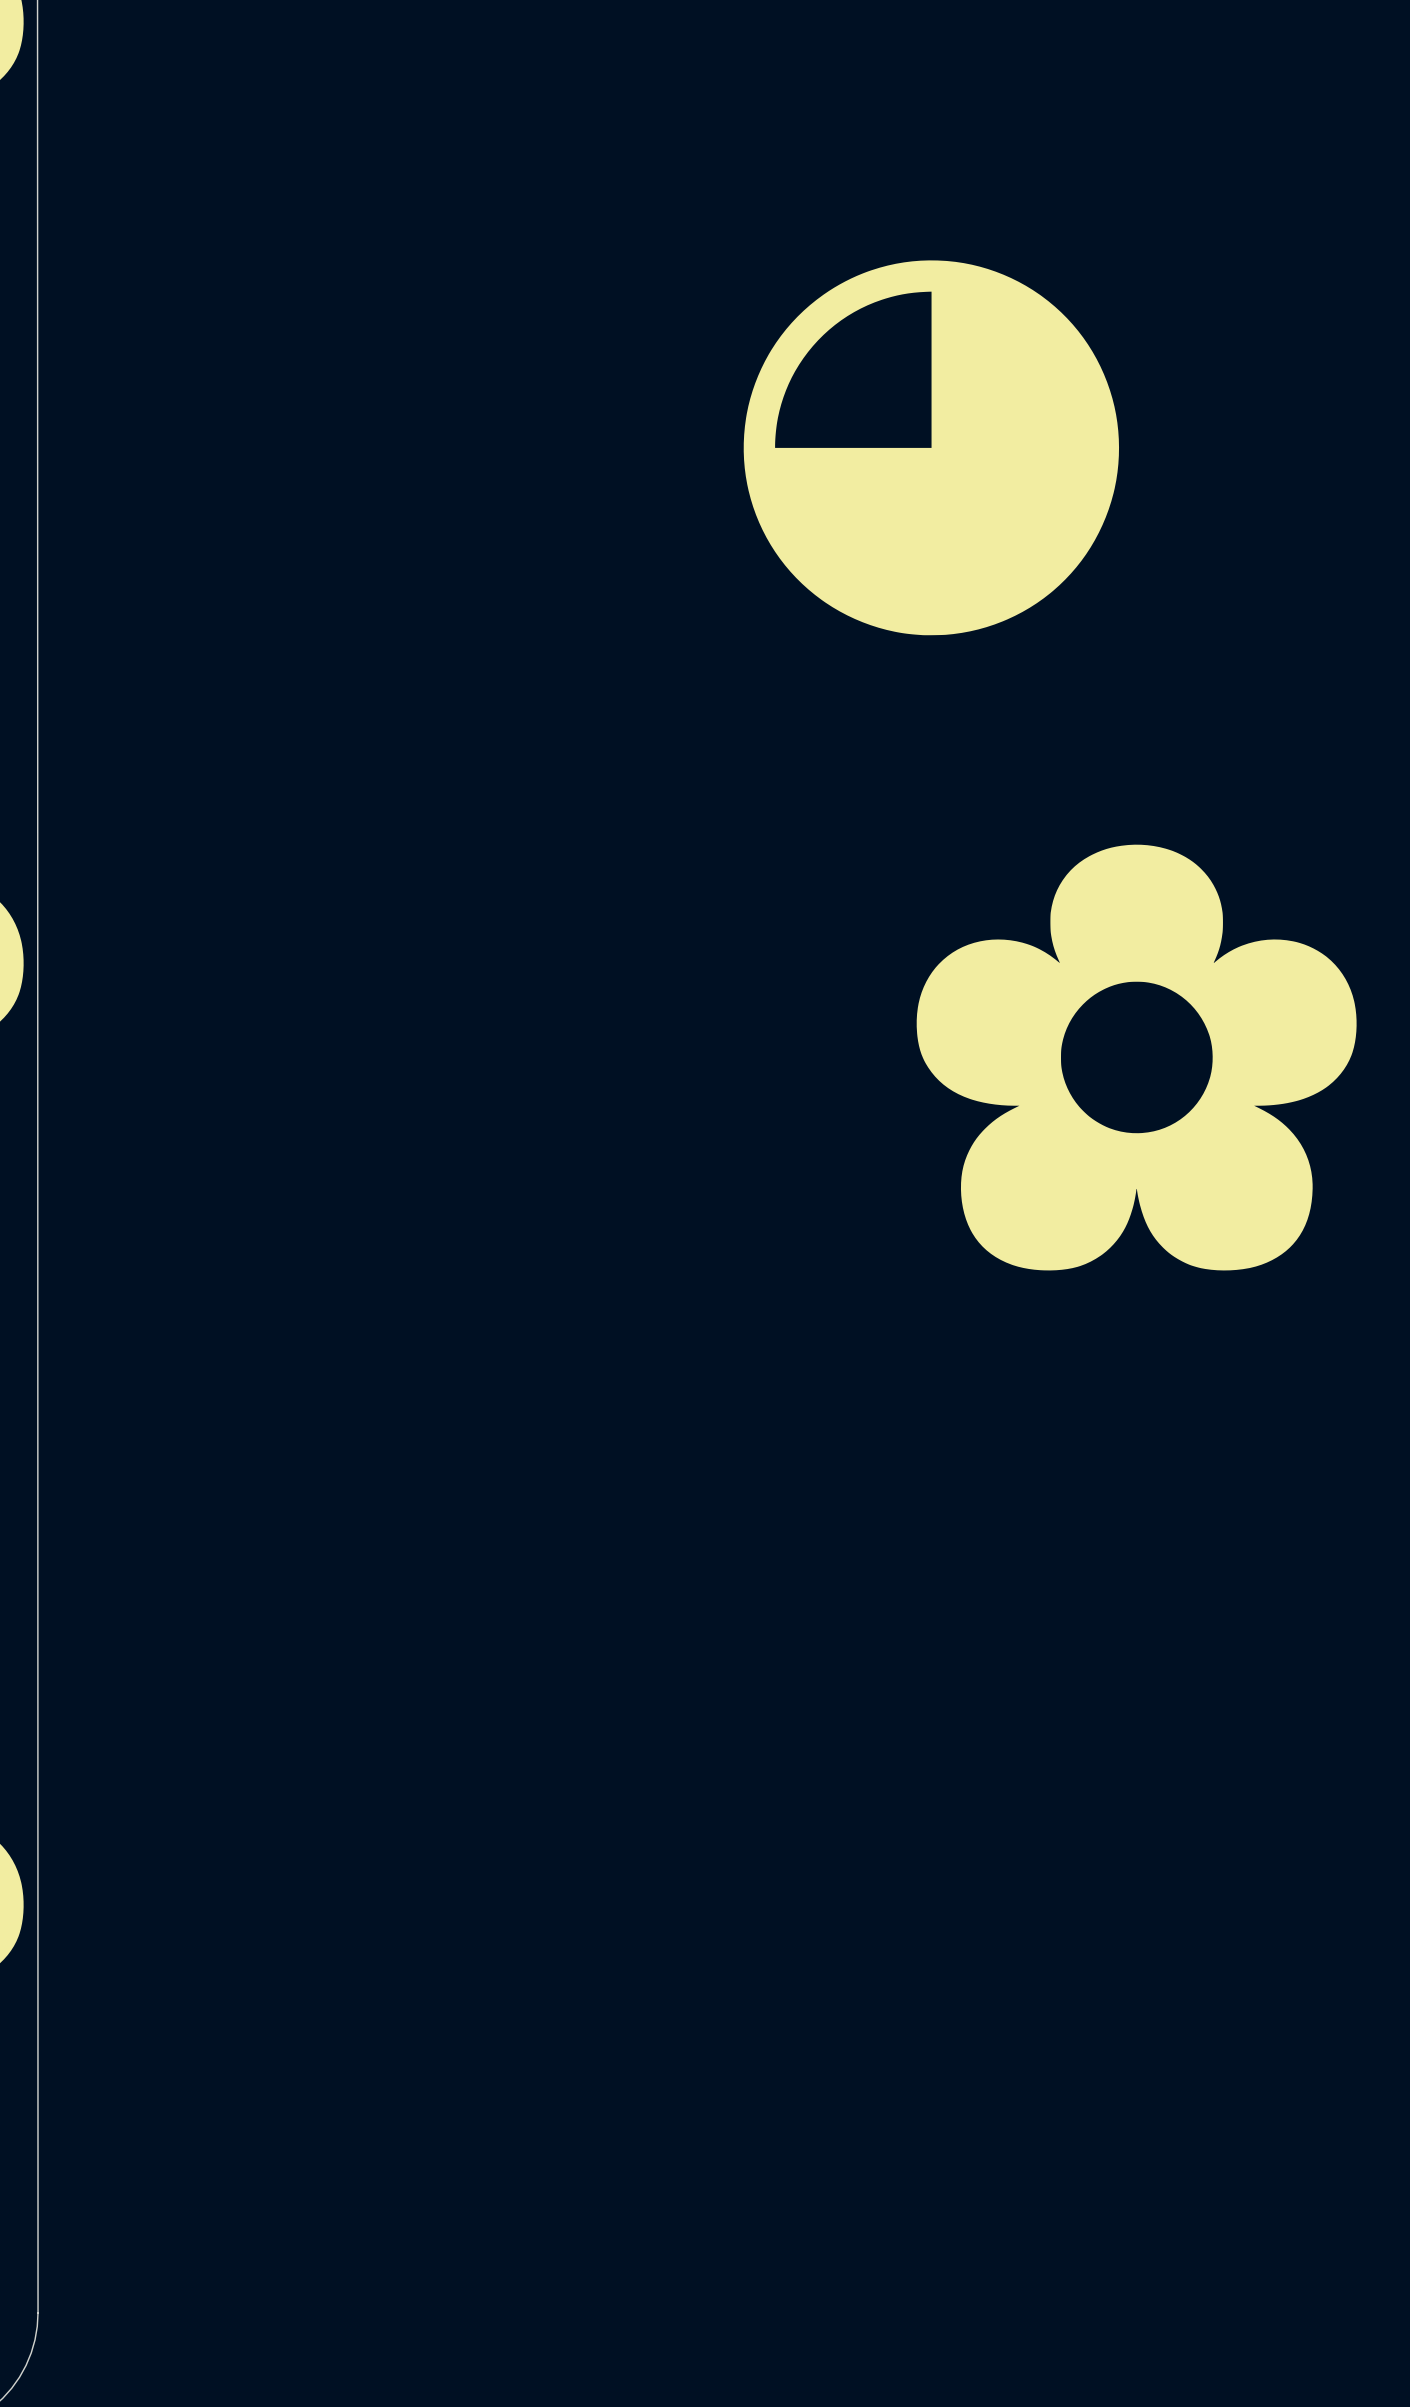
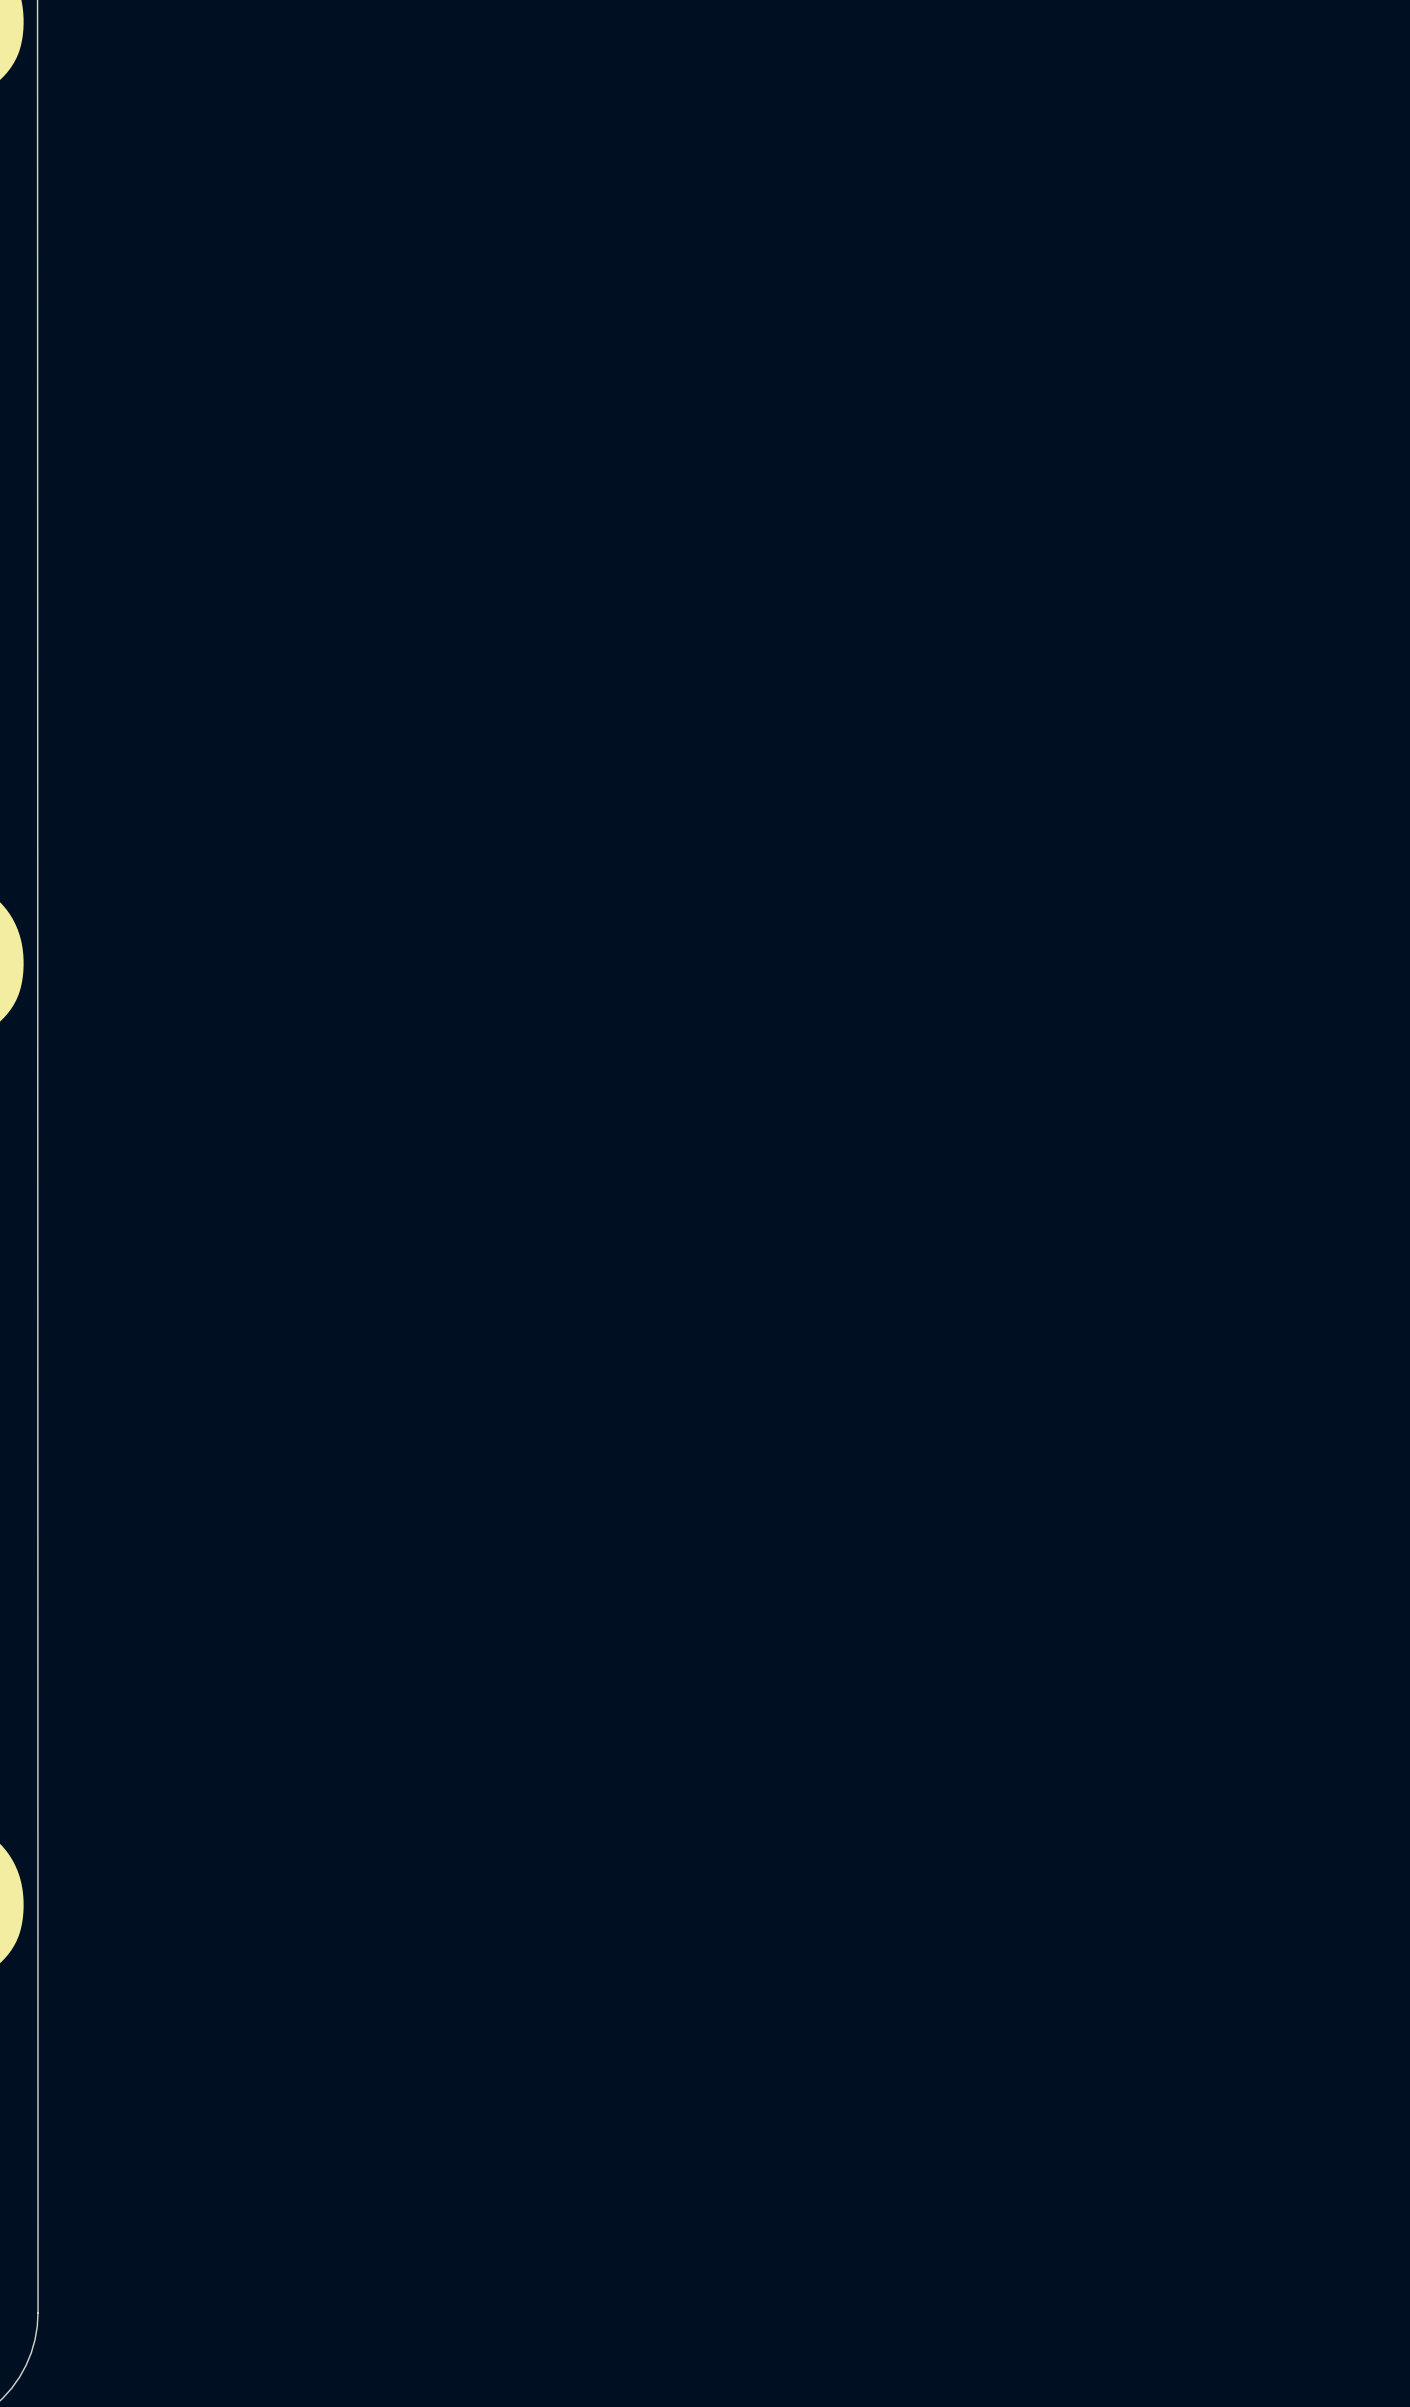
drawing: [743, 260, 1120, 636] -> none
drawing: [916, 844, 1357, 1271] -> none

